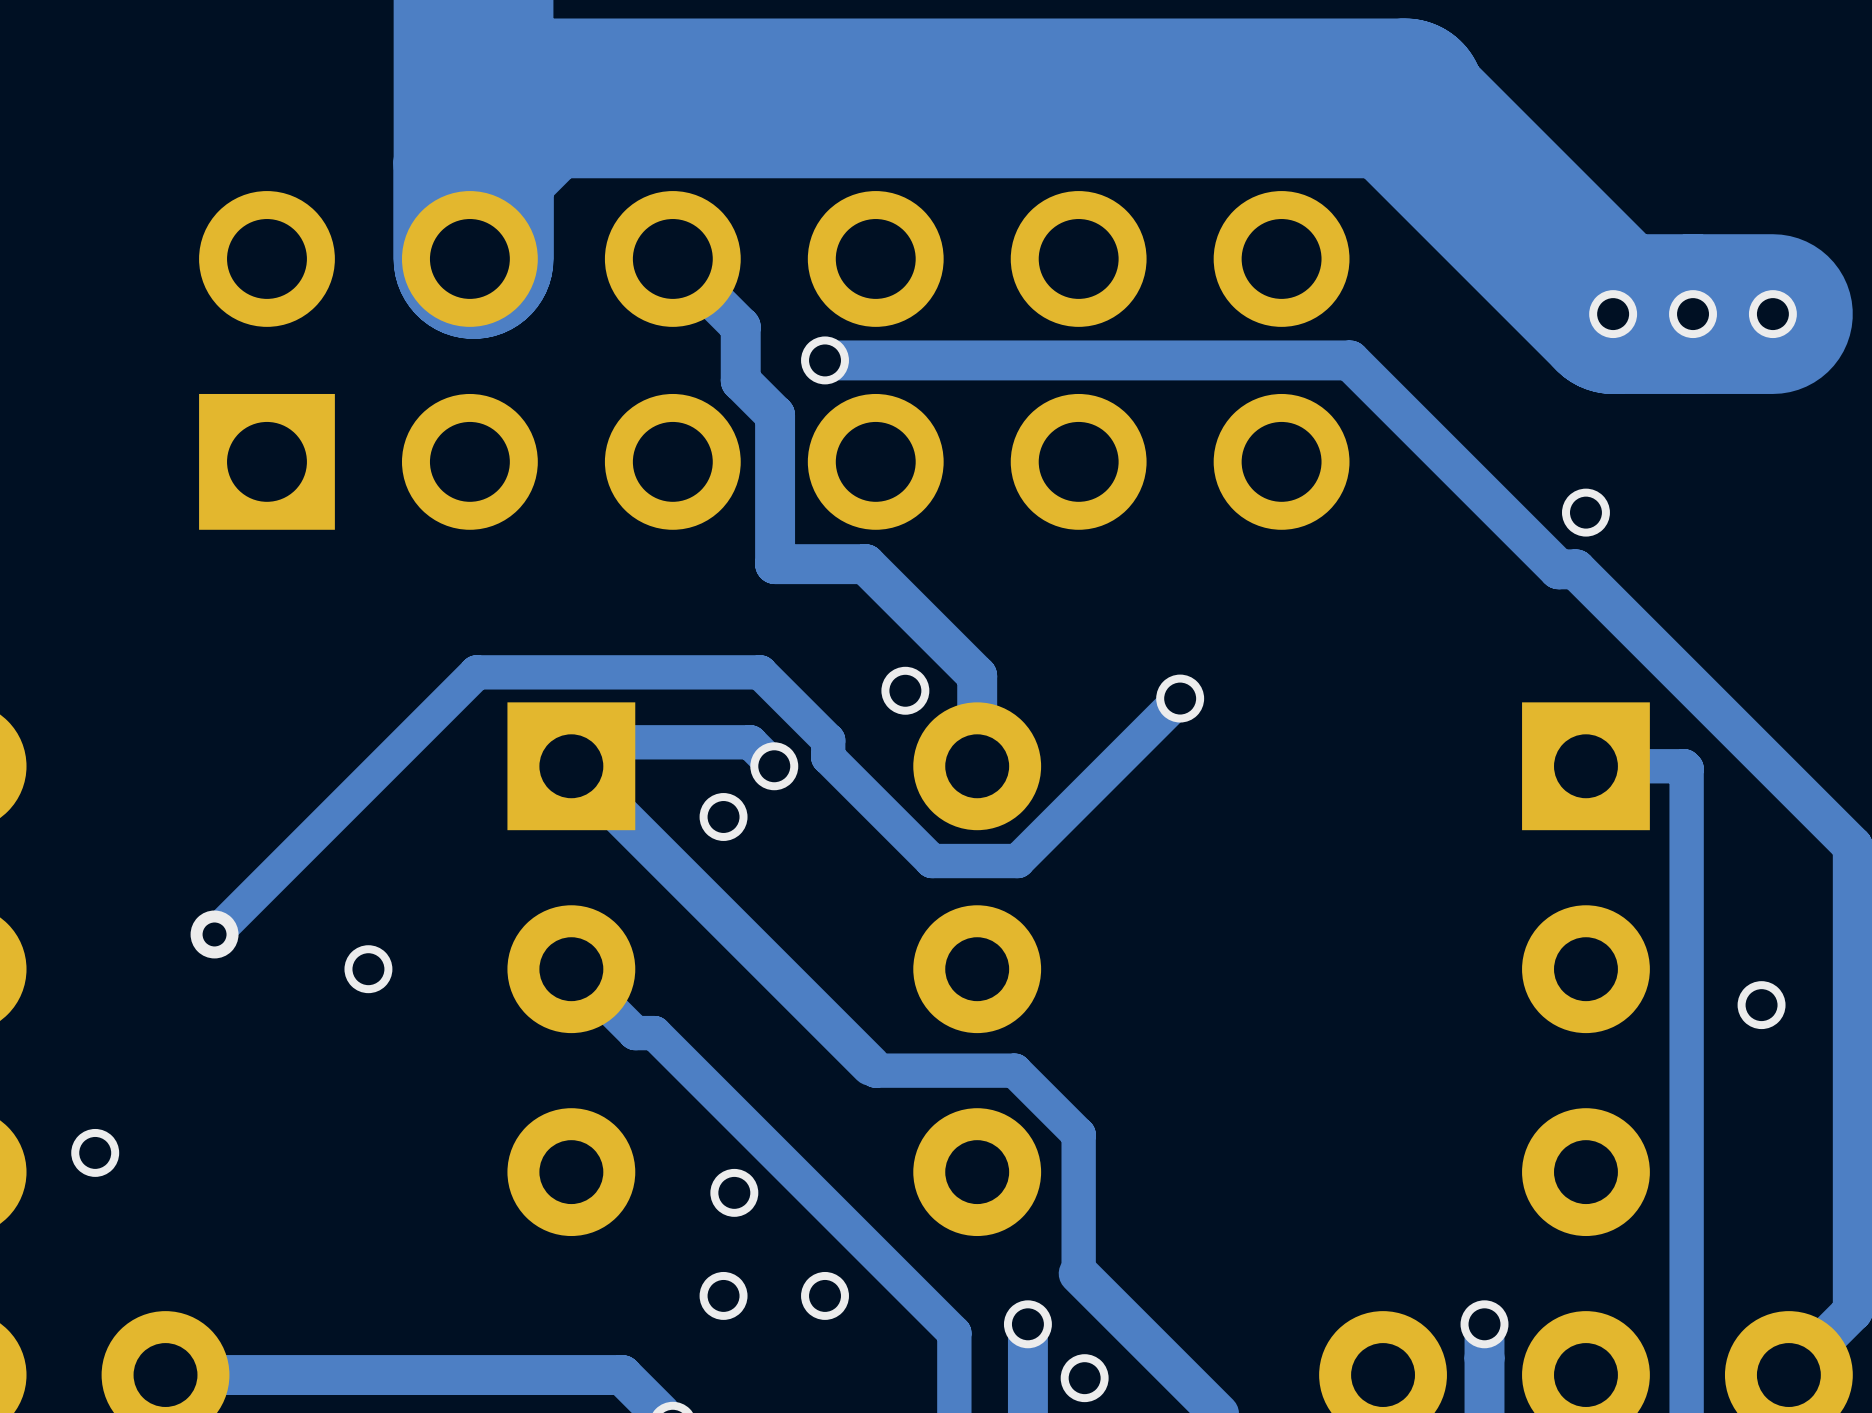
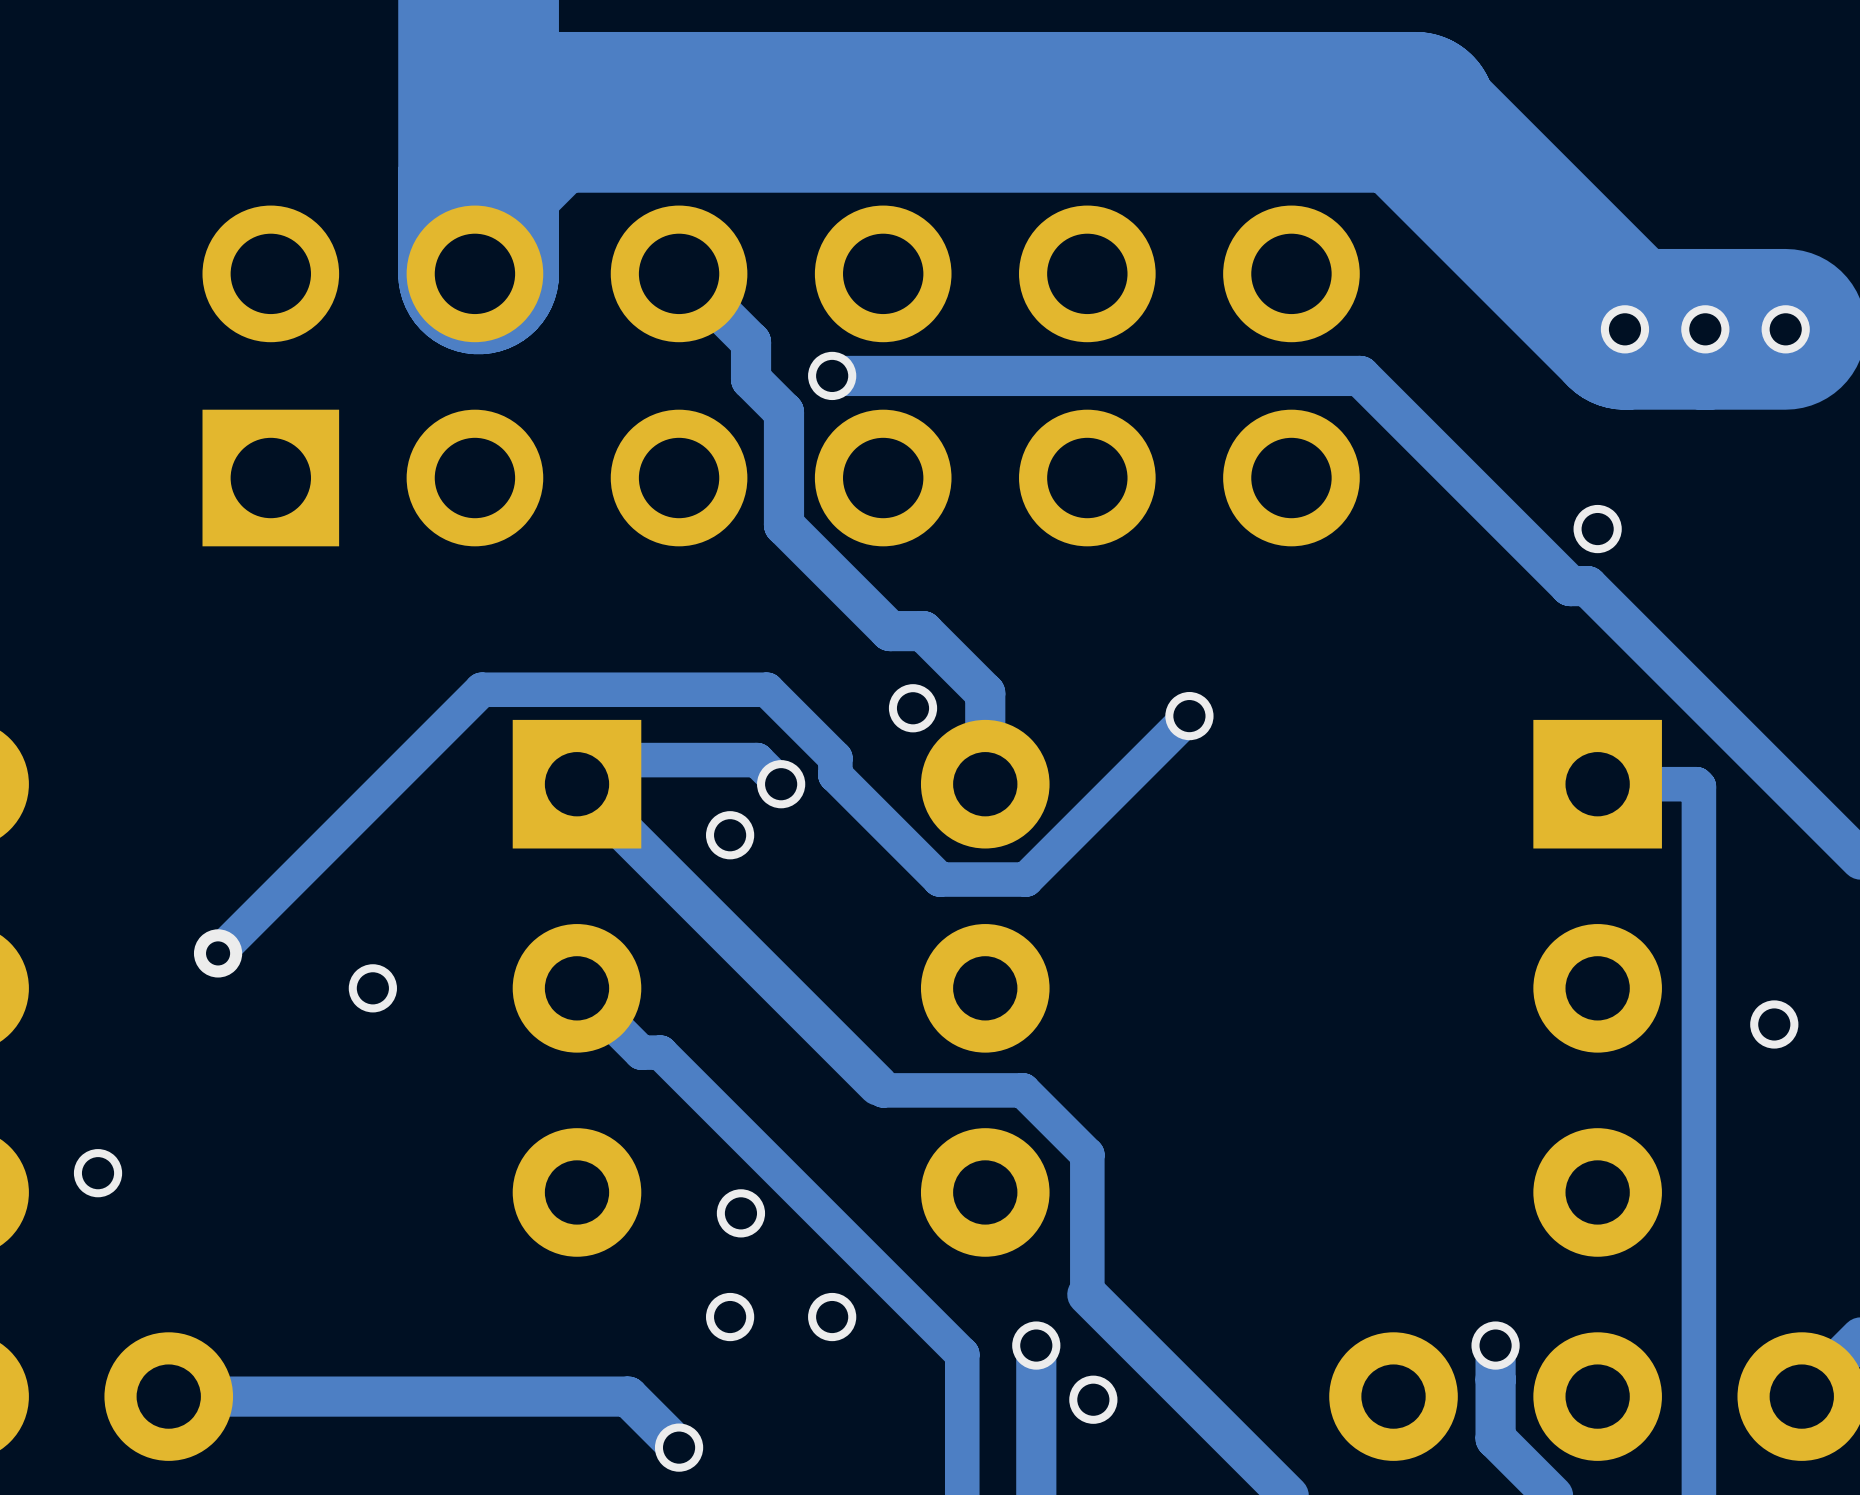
track: (672, 258) (740, 326) (740, 380) (775, 415) (775, 564) (865, 564) (915, 614) -> (682, 273) (751, 342) (751, 379) (783, 412) (783, 525) (890, 631) (923, 631)

